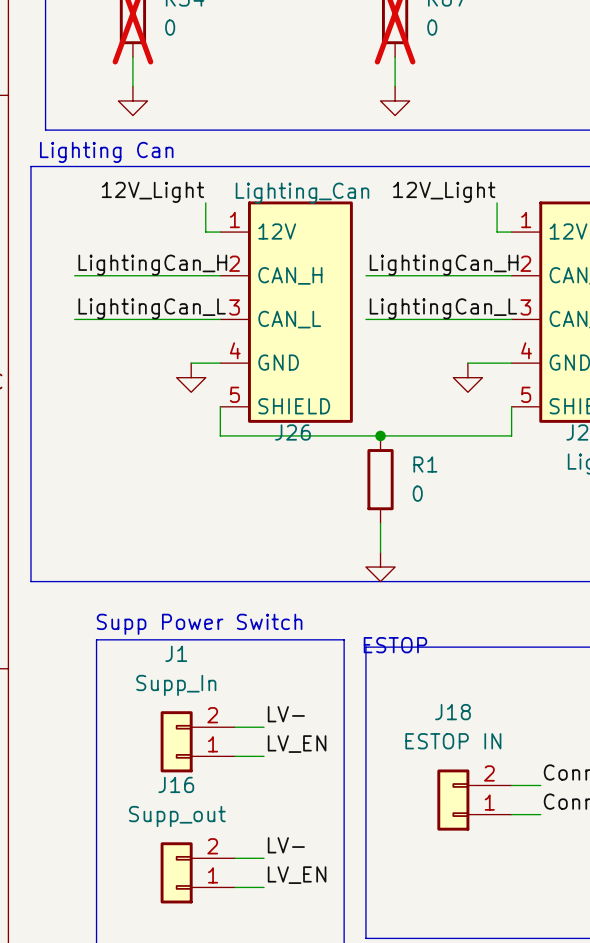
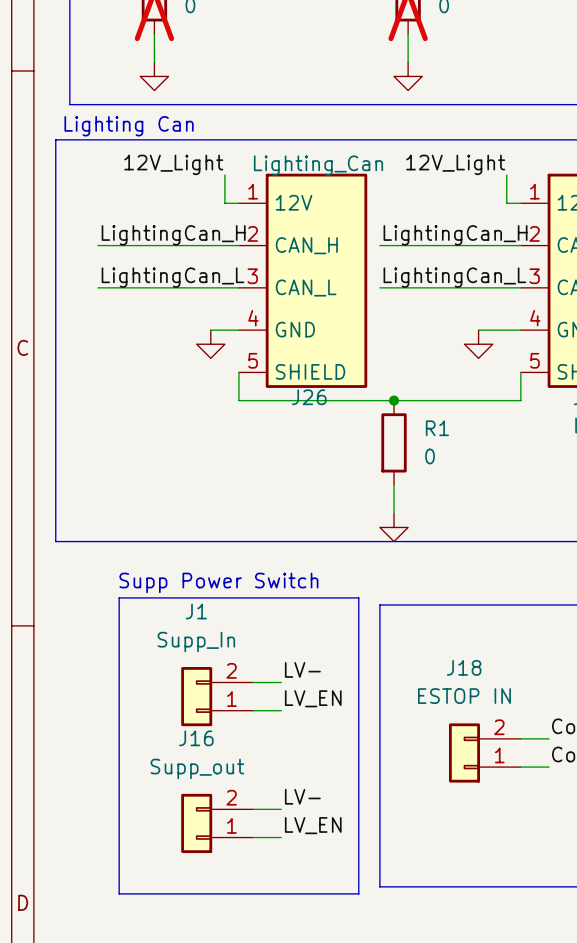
text: ESTOP (395, 645) -> none

